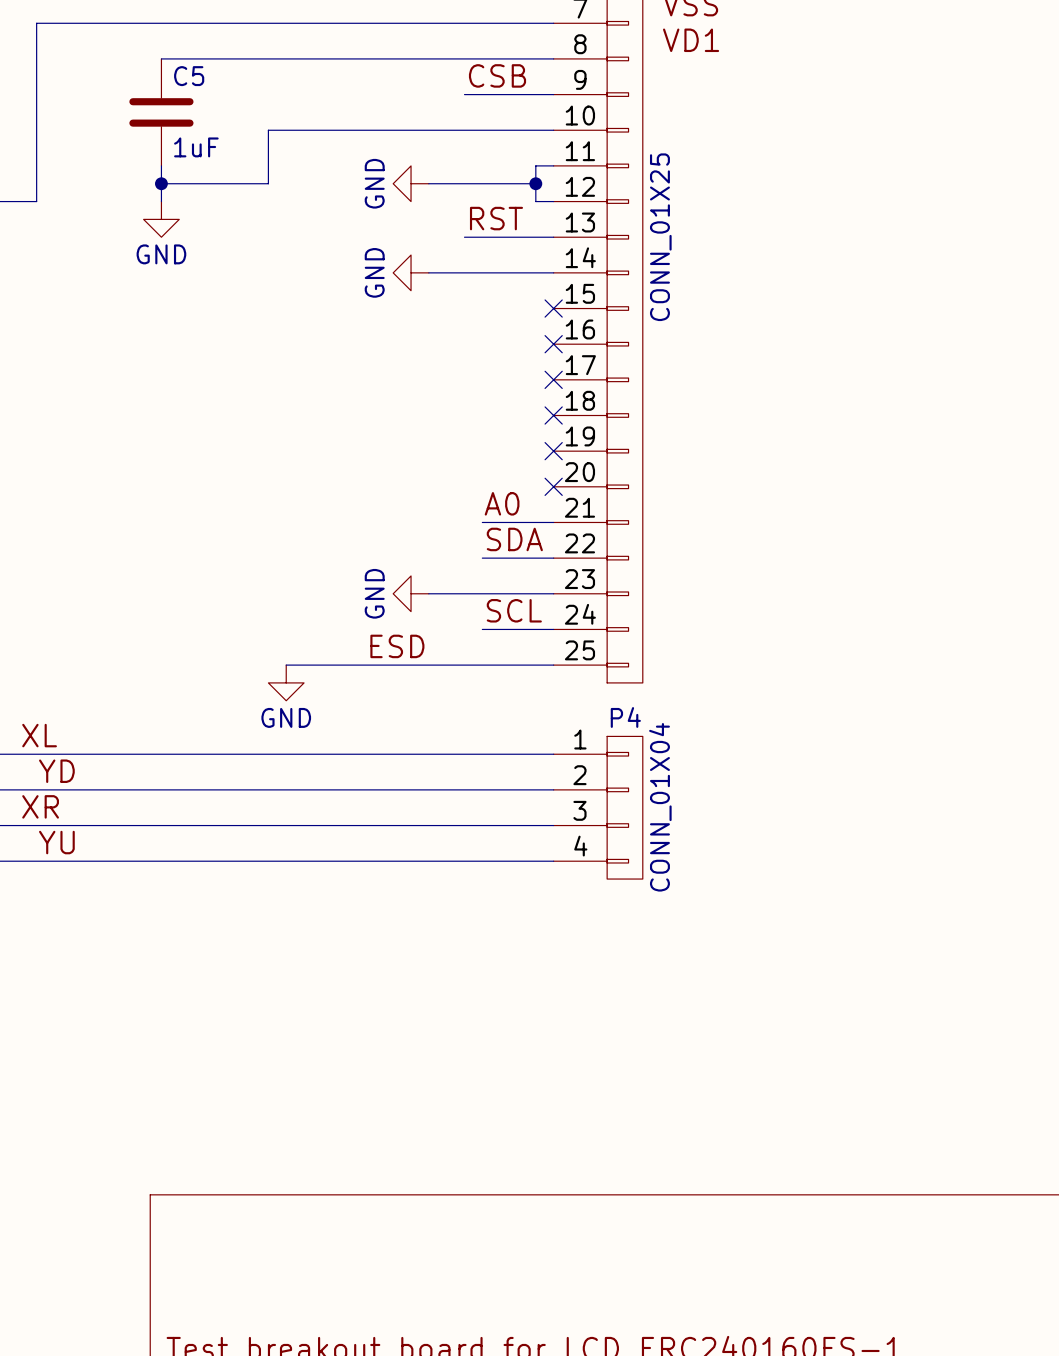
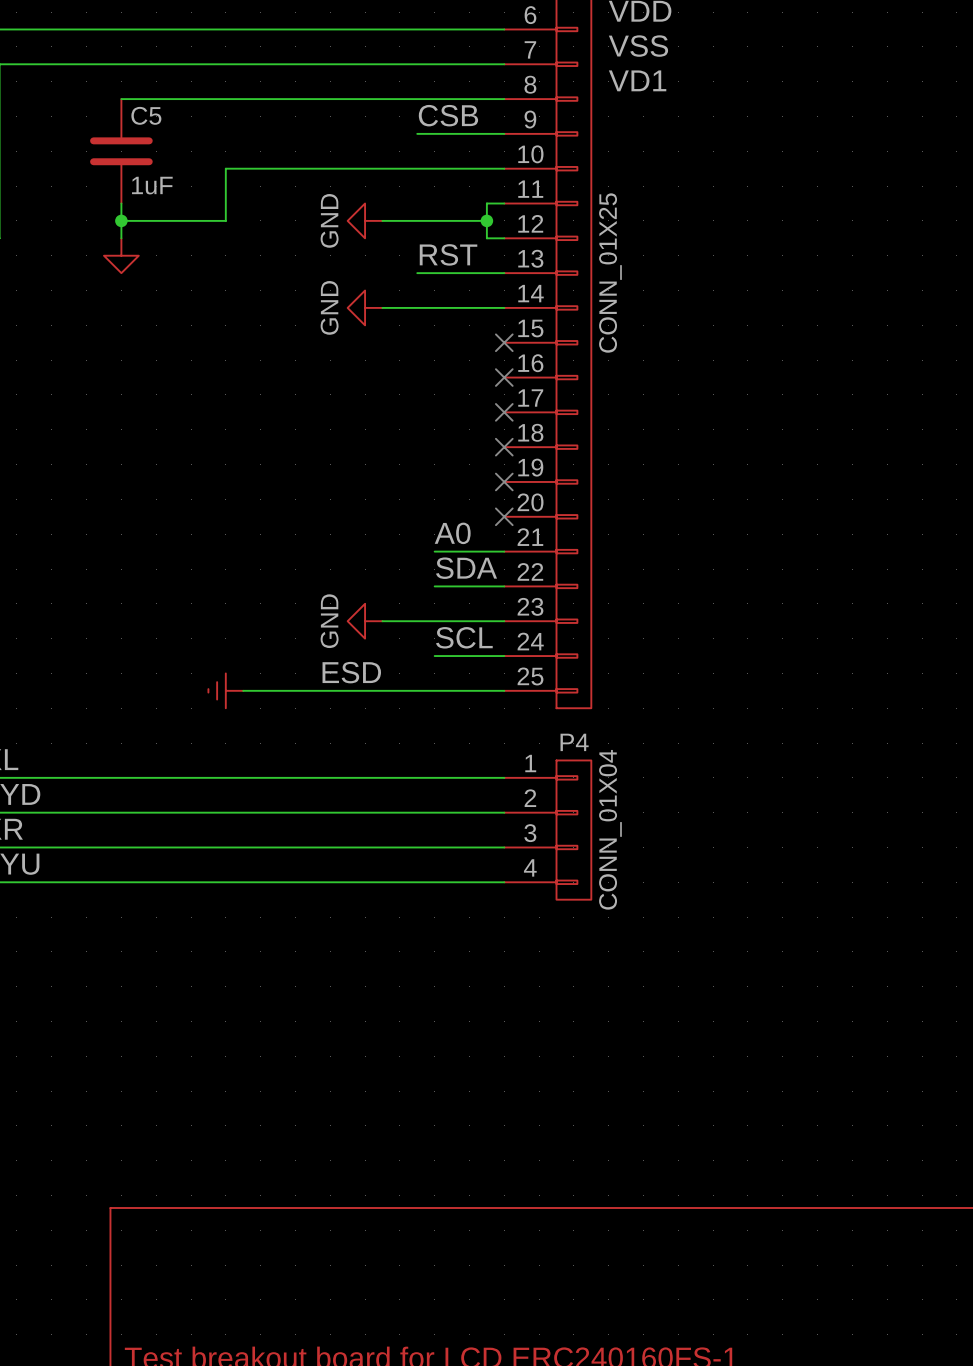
power symbol text: GND (161, 254) -> none
power symbol: none -> (225, 690)
power symbol: GND (286, 682) -> none

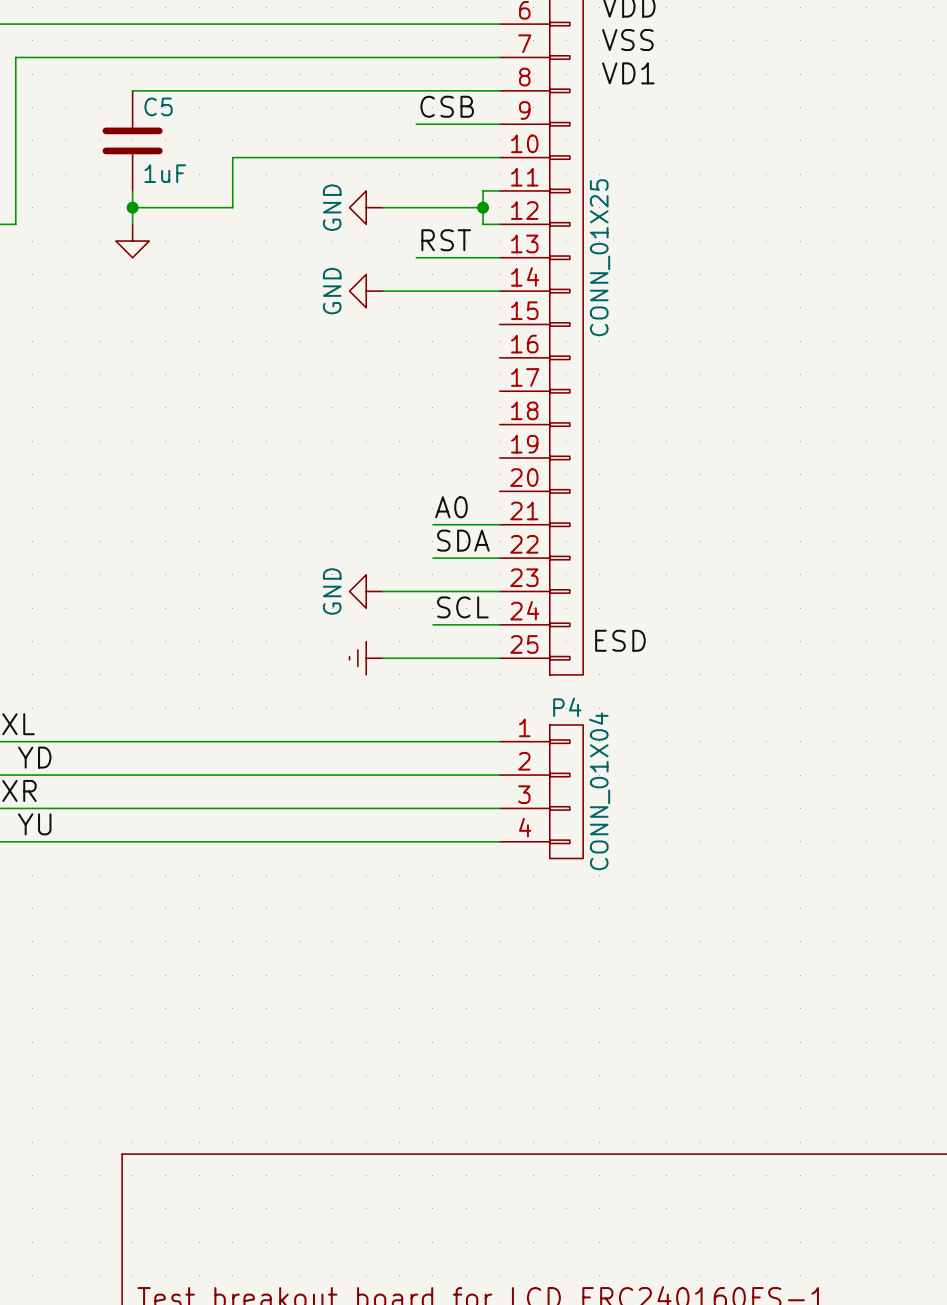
no-connect mark: (504, 342) -> none
no-connect mark: (504, 377) -> none
no-connect mark: (504, 412) -> none
no-connect mark: (504, 447) -> none
no-connect mark: (504, 481) -> none
no-connect mark: (504, 516) -> none
label position: ESD (351, 672) -> ESD (620, 640)
power symbol position: (225, 690) -> (366, 658)
wire: (243, 690) (382, 690) -> none

